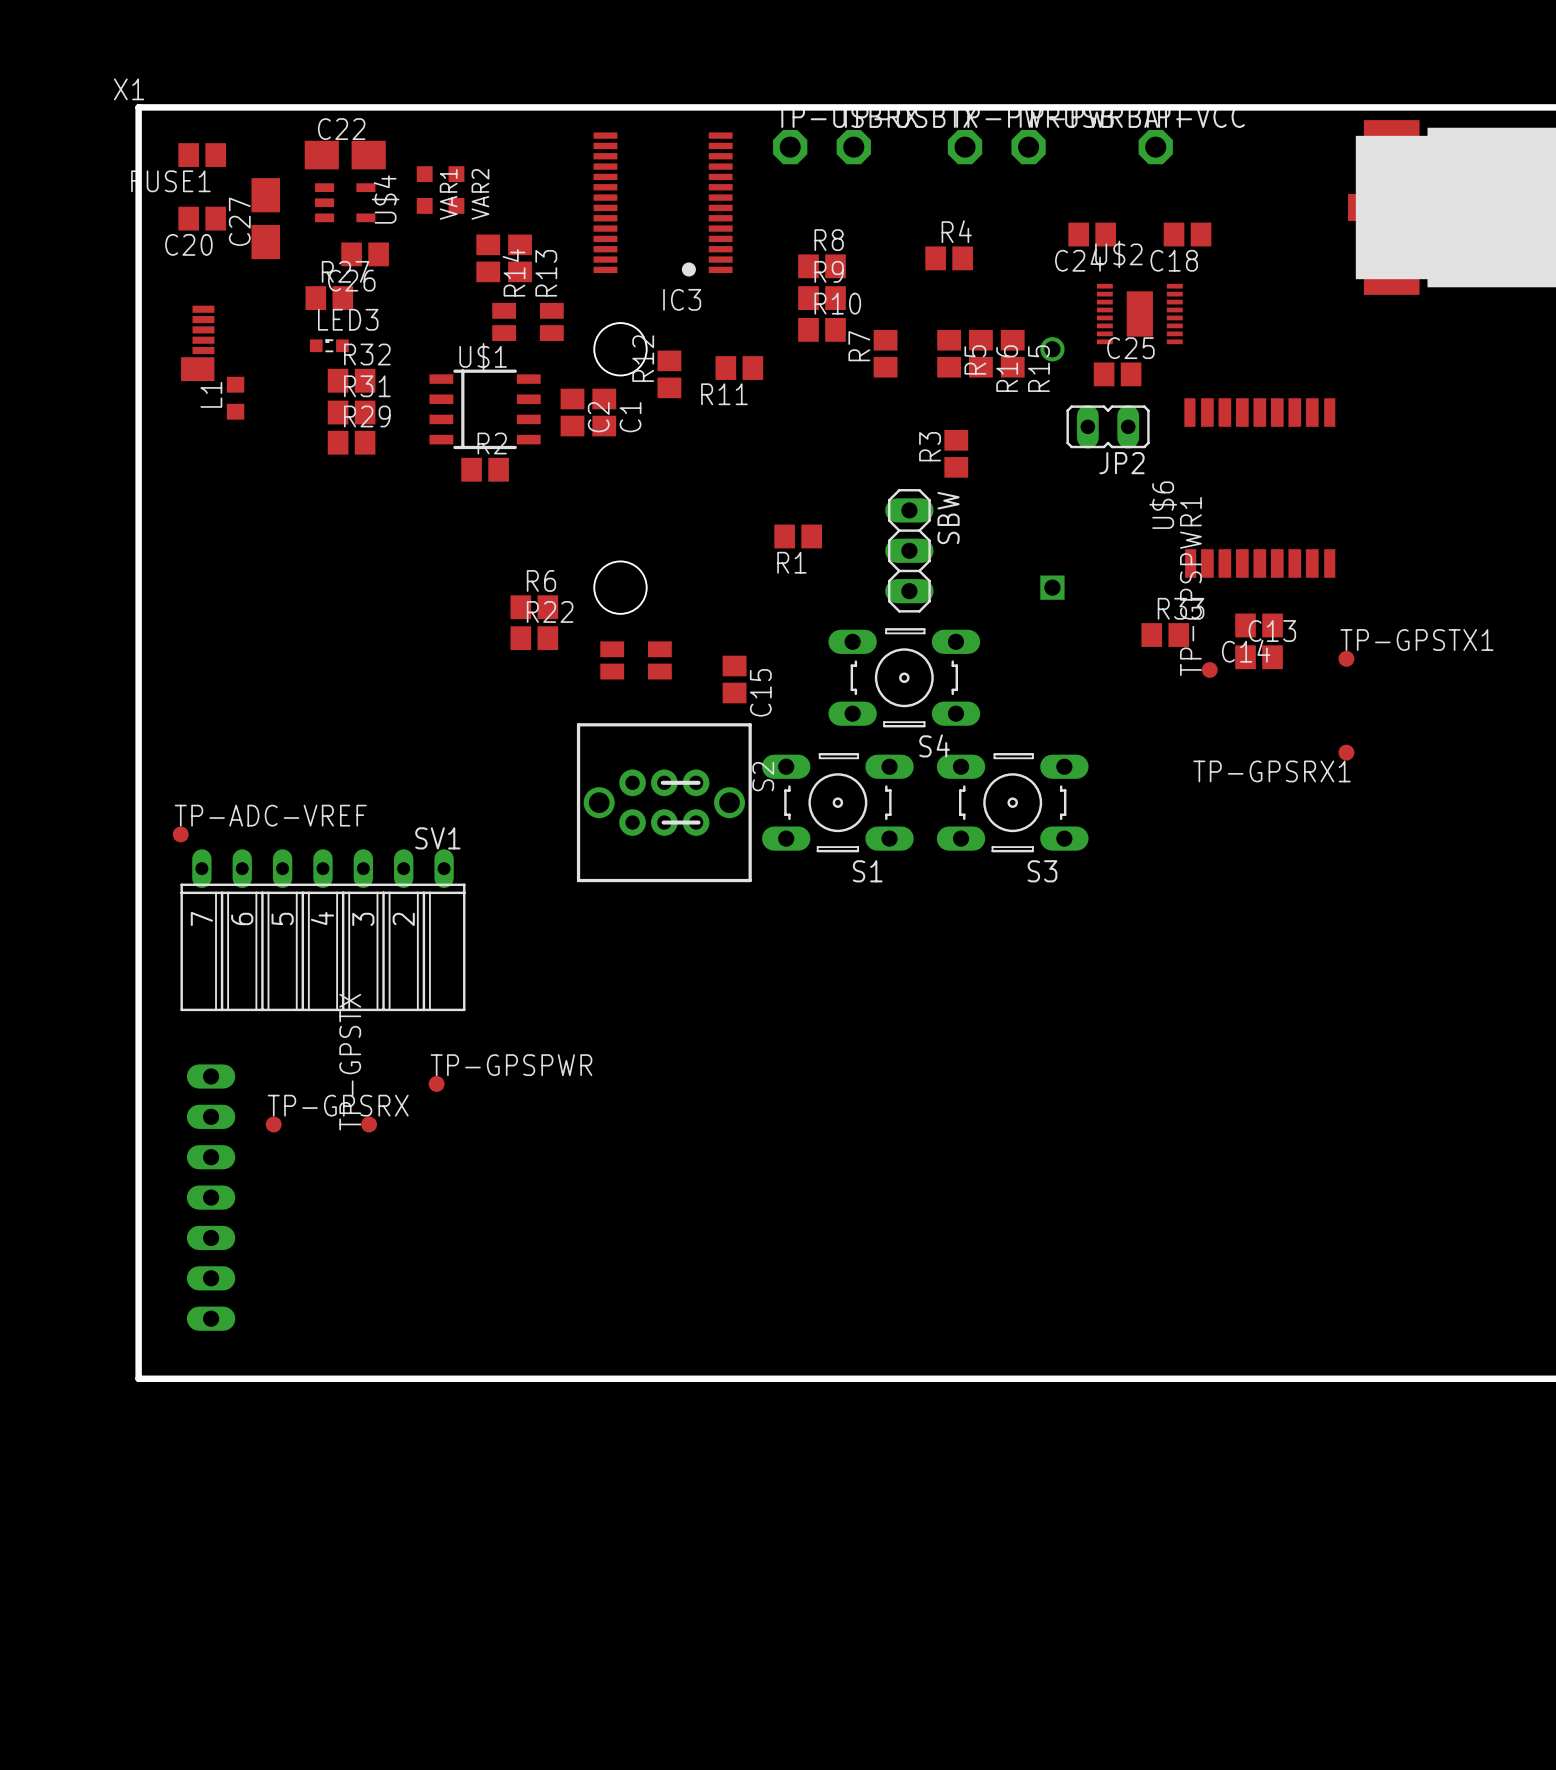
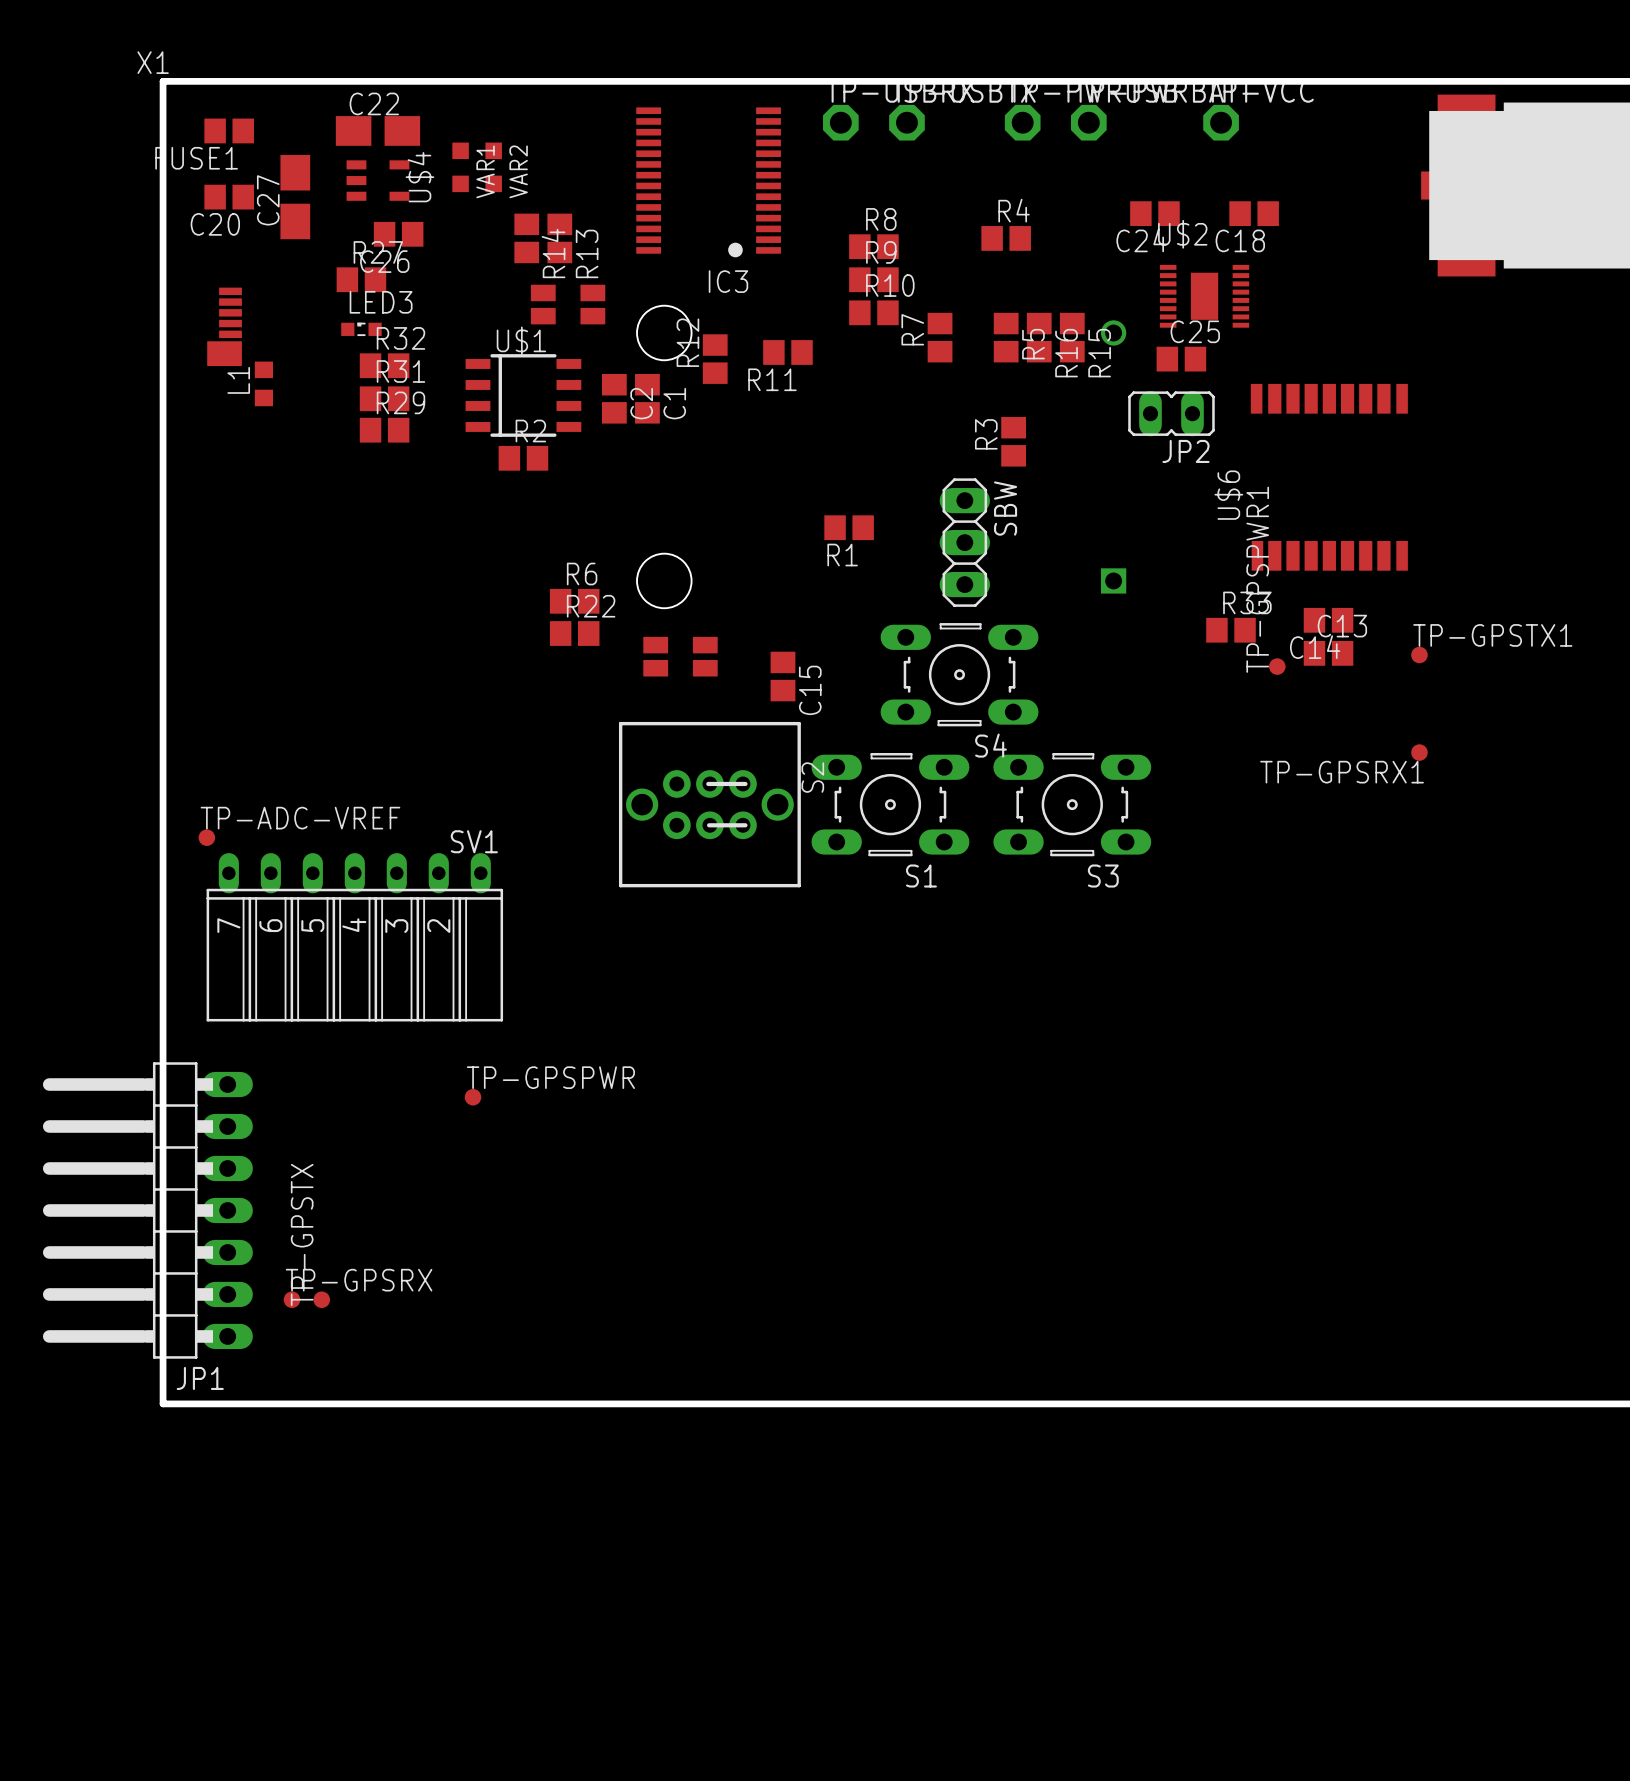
TP-GPSRX position: (273, 1124) -> (292, 1299)
TP-GPSTX position: (369, 1124) -> (321, 1299)
JP1 side: bottom (211, 1197) -> top (147, 1210)

